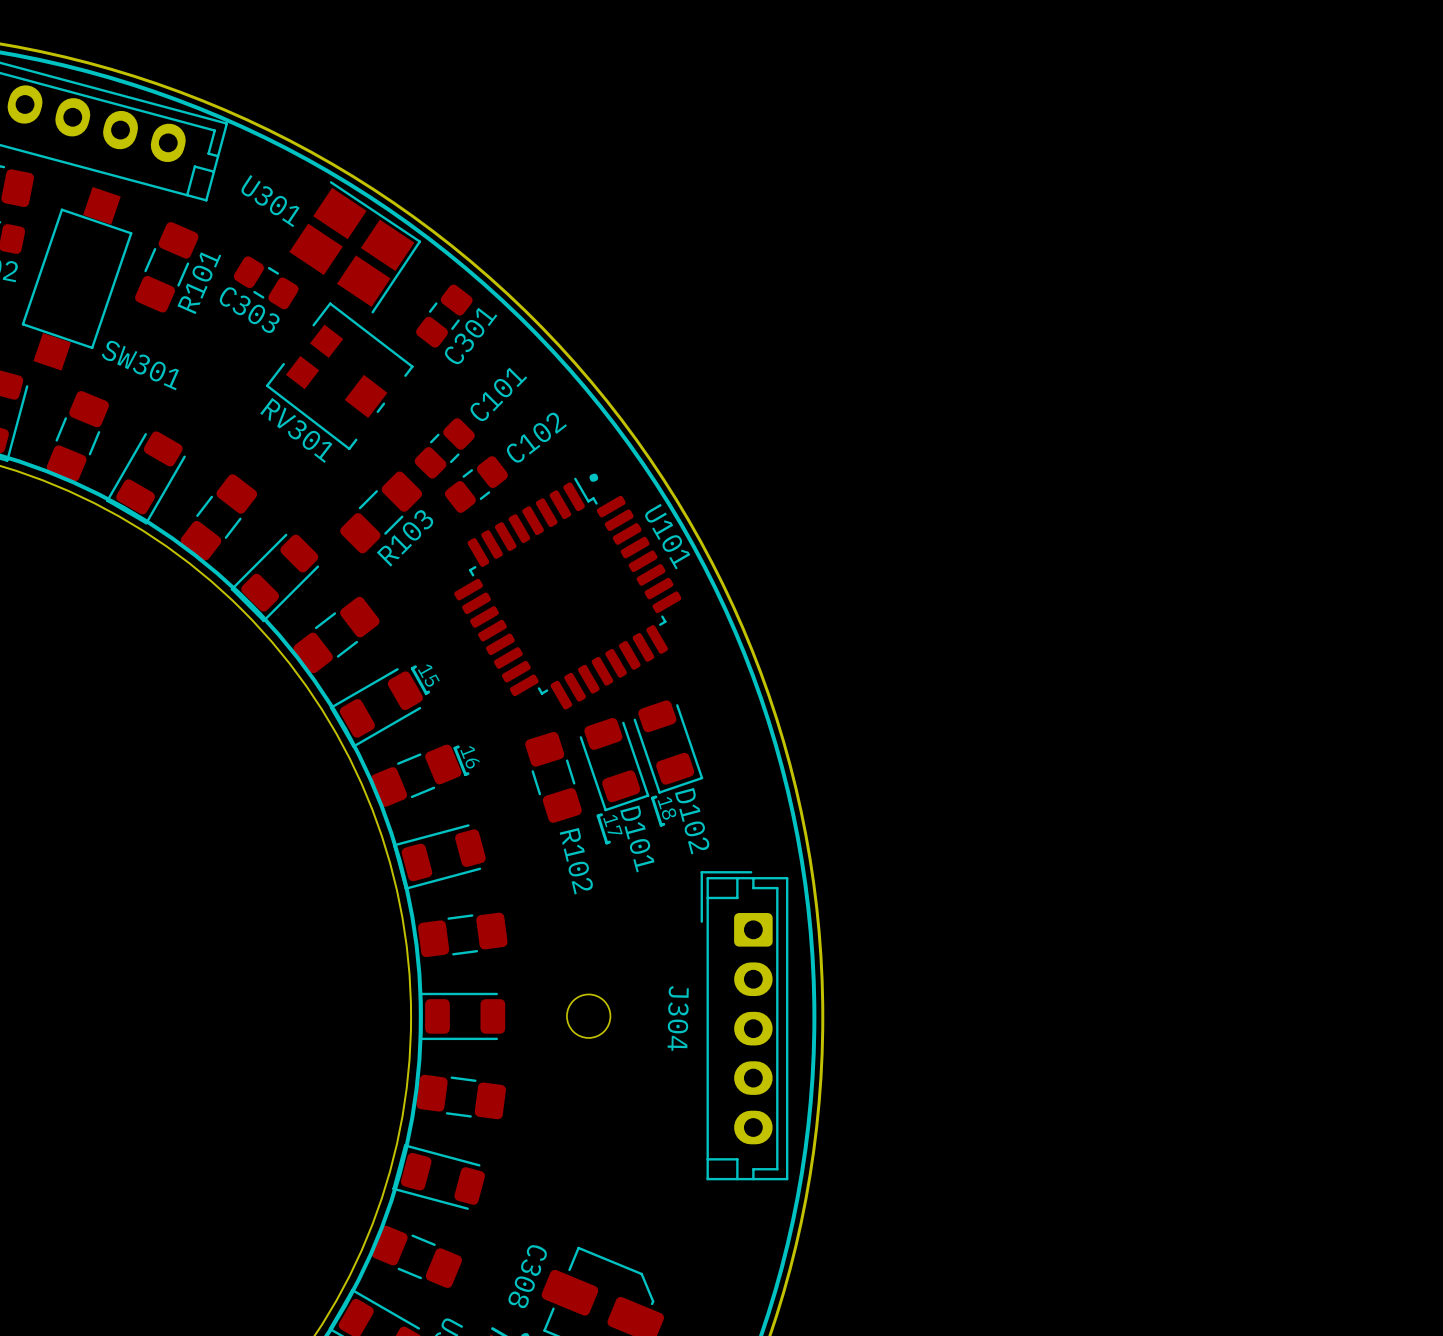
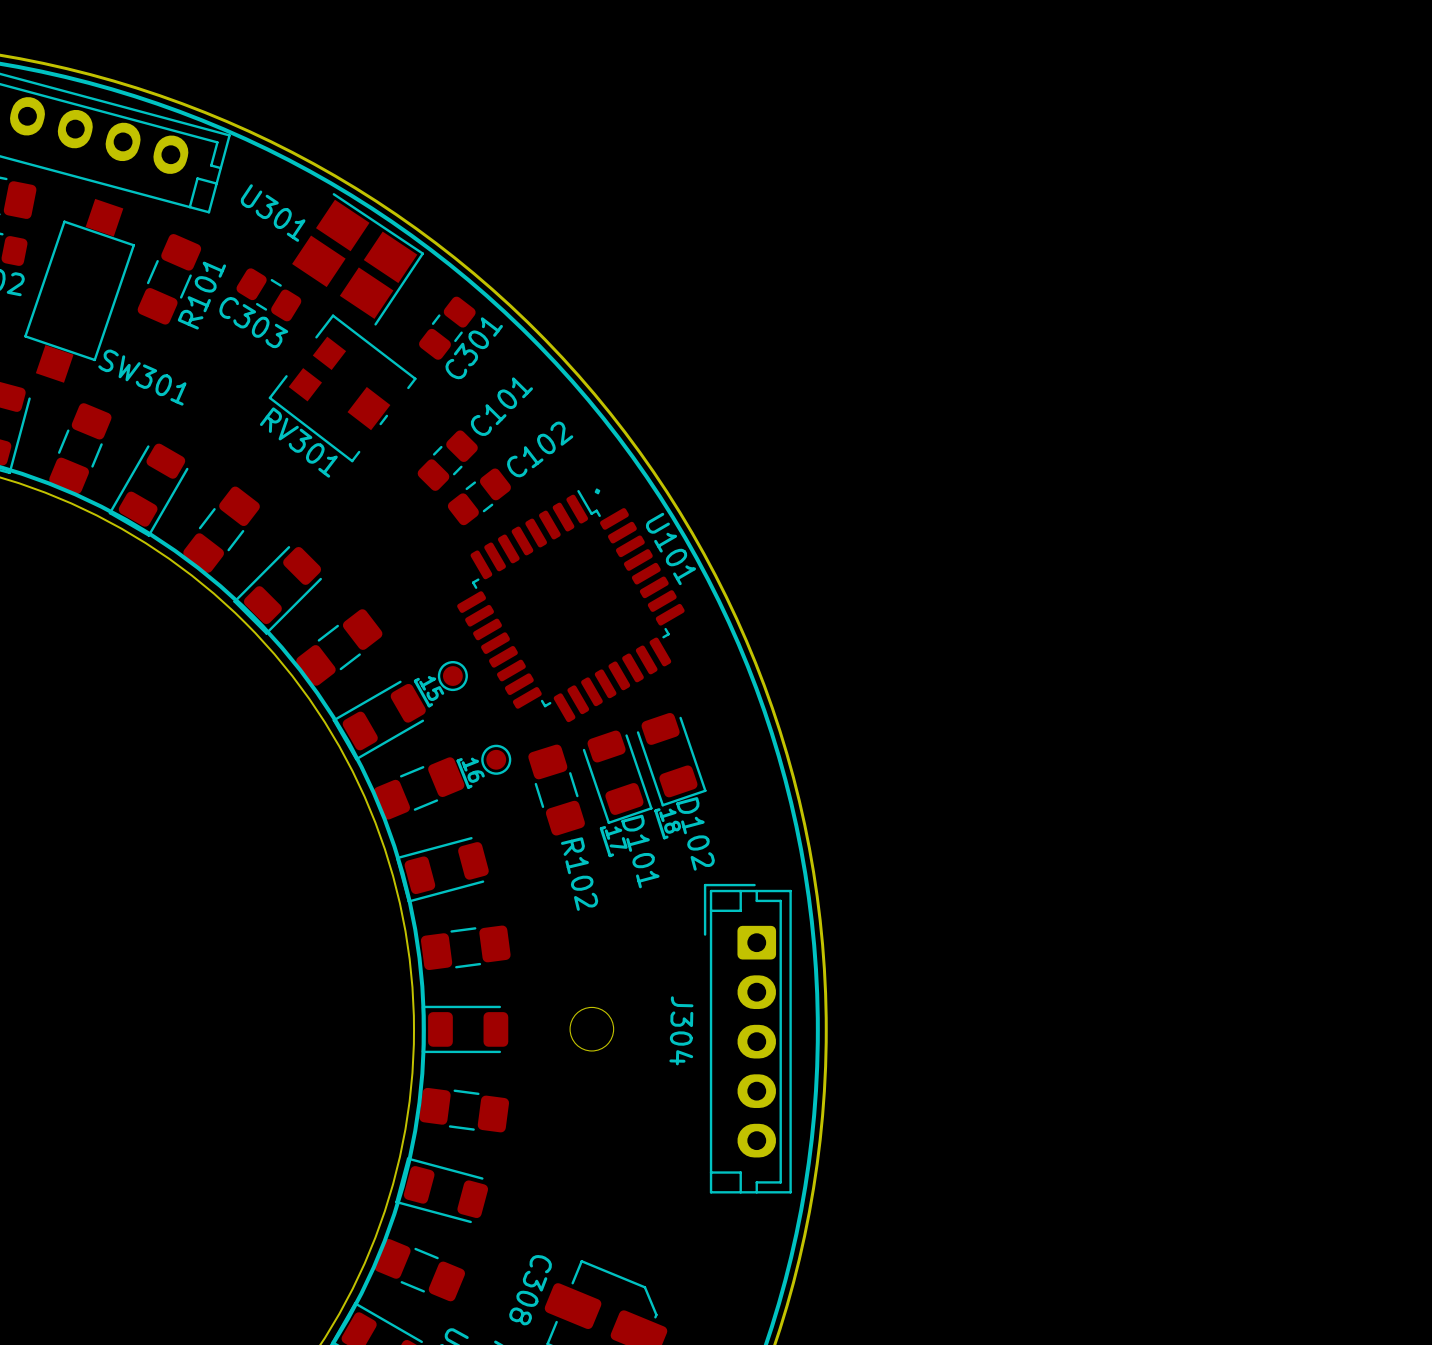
R103: (381, 512) -> none
part: none -> (452, 676)
part: none -> (496, 759)

